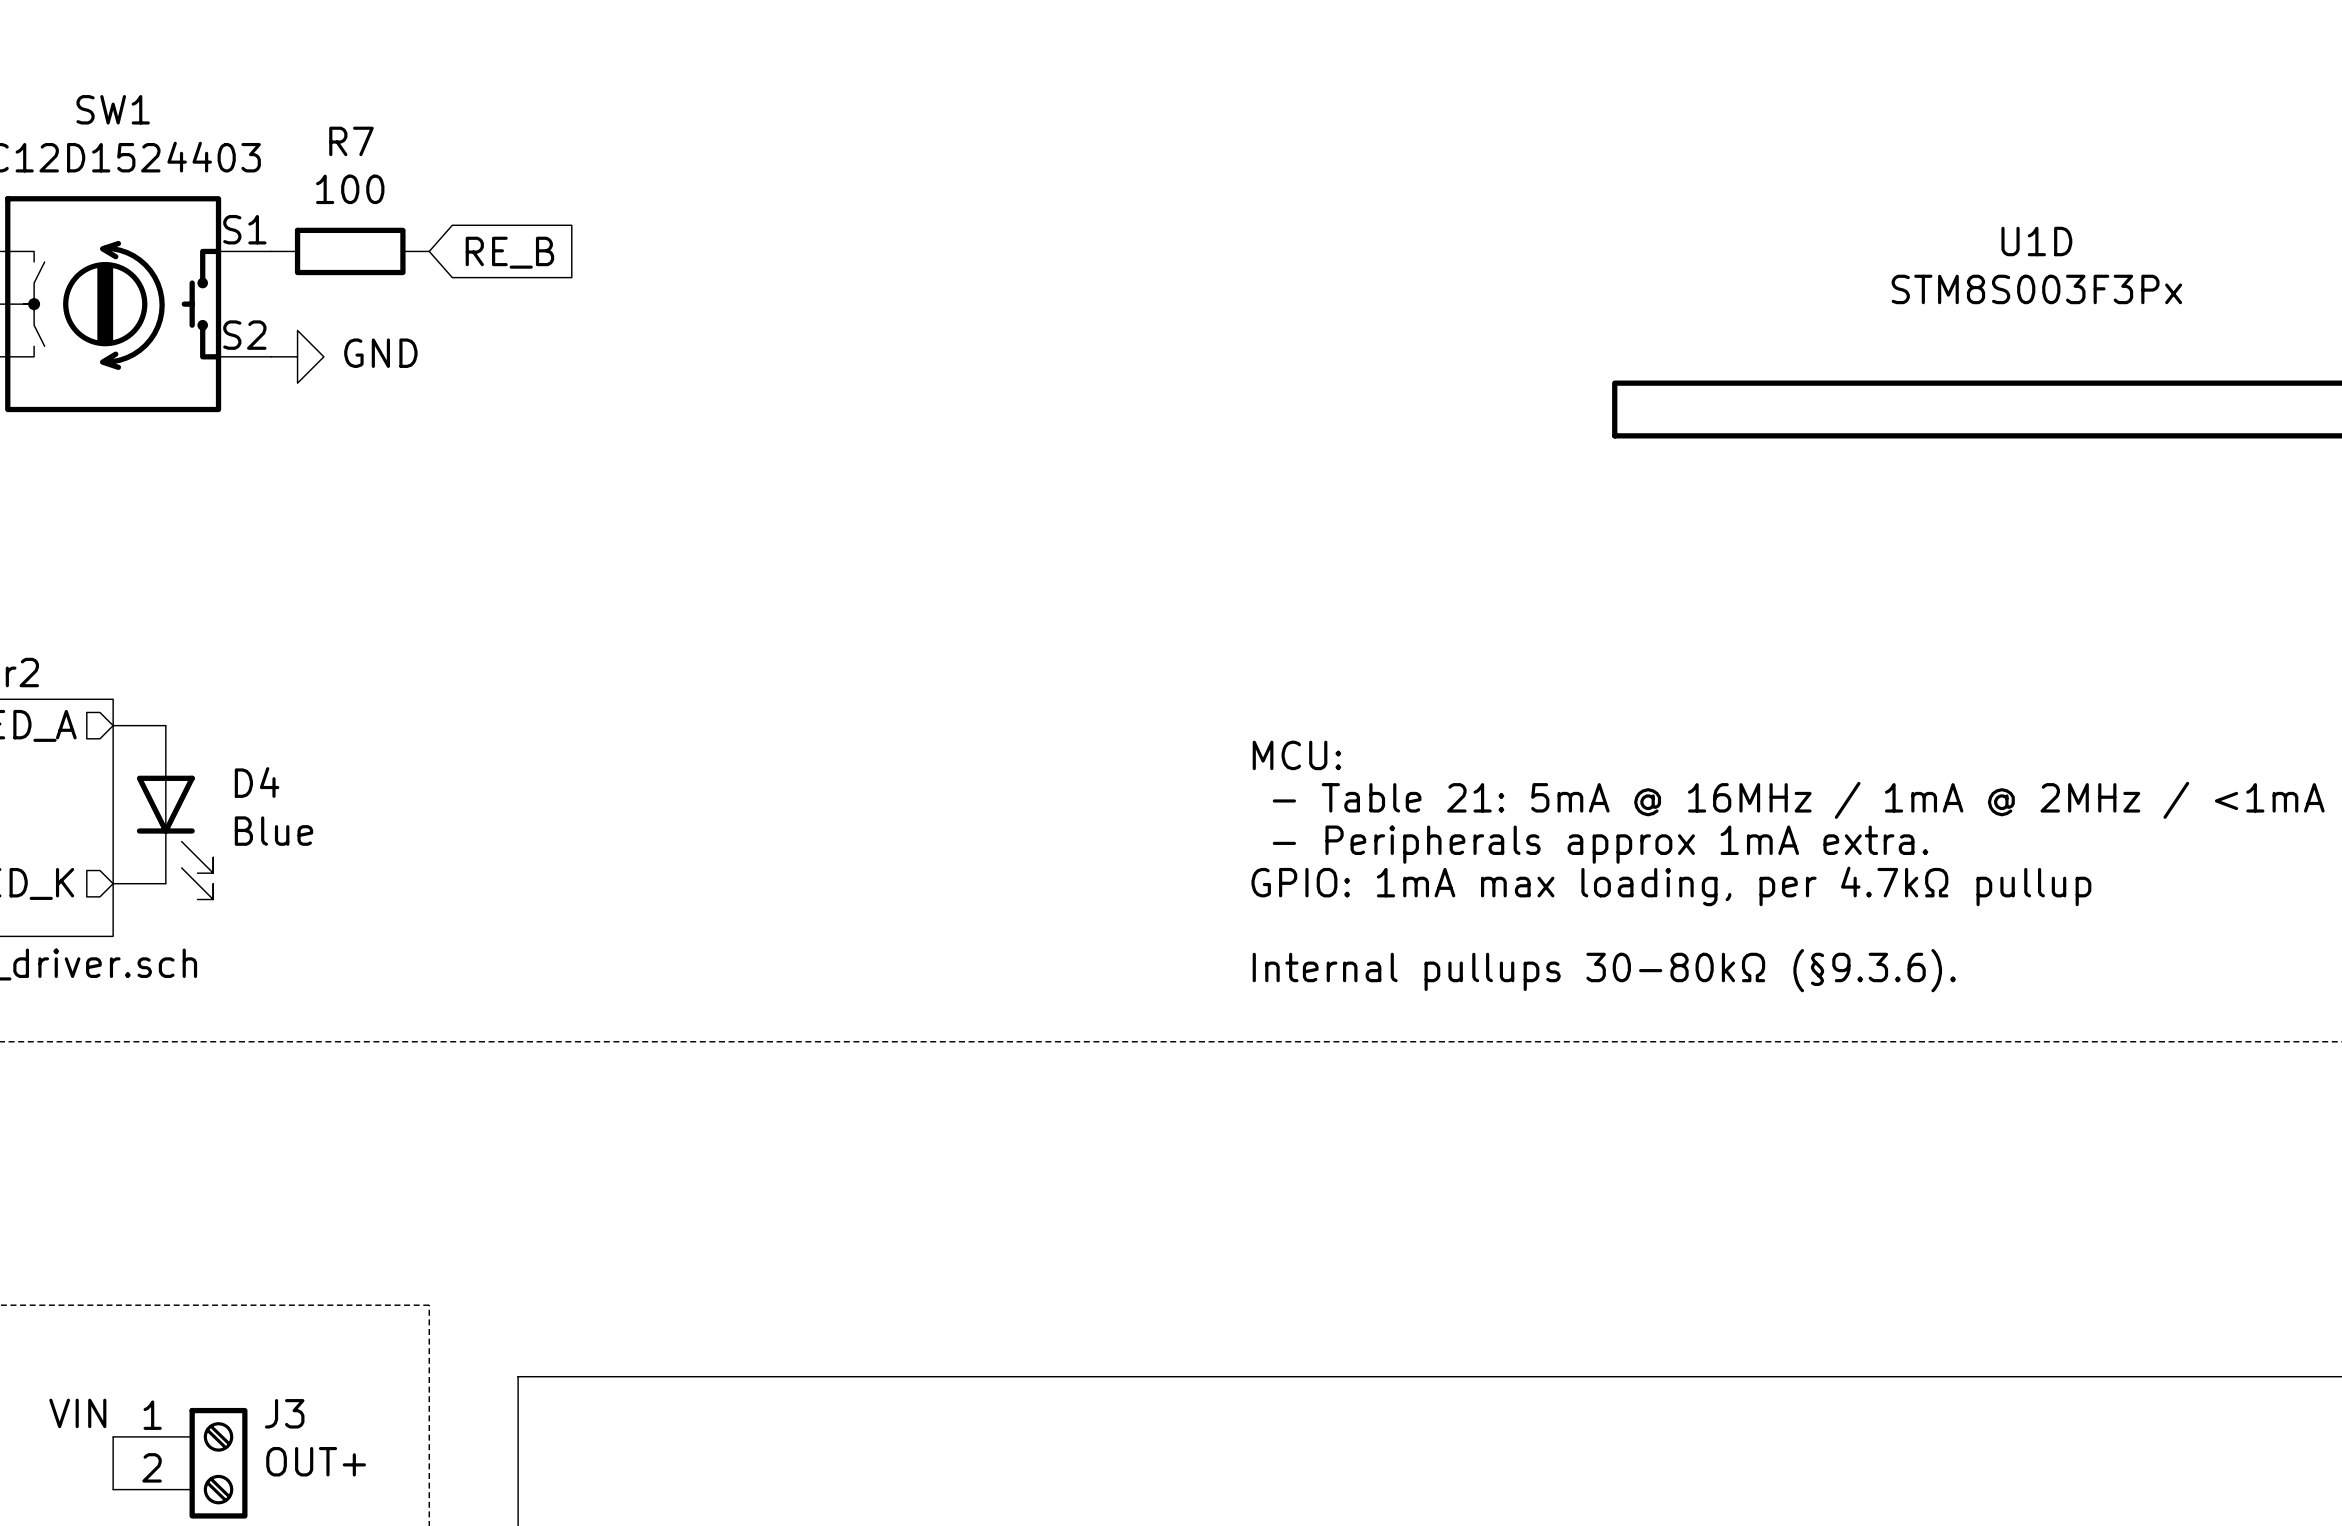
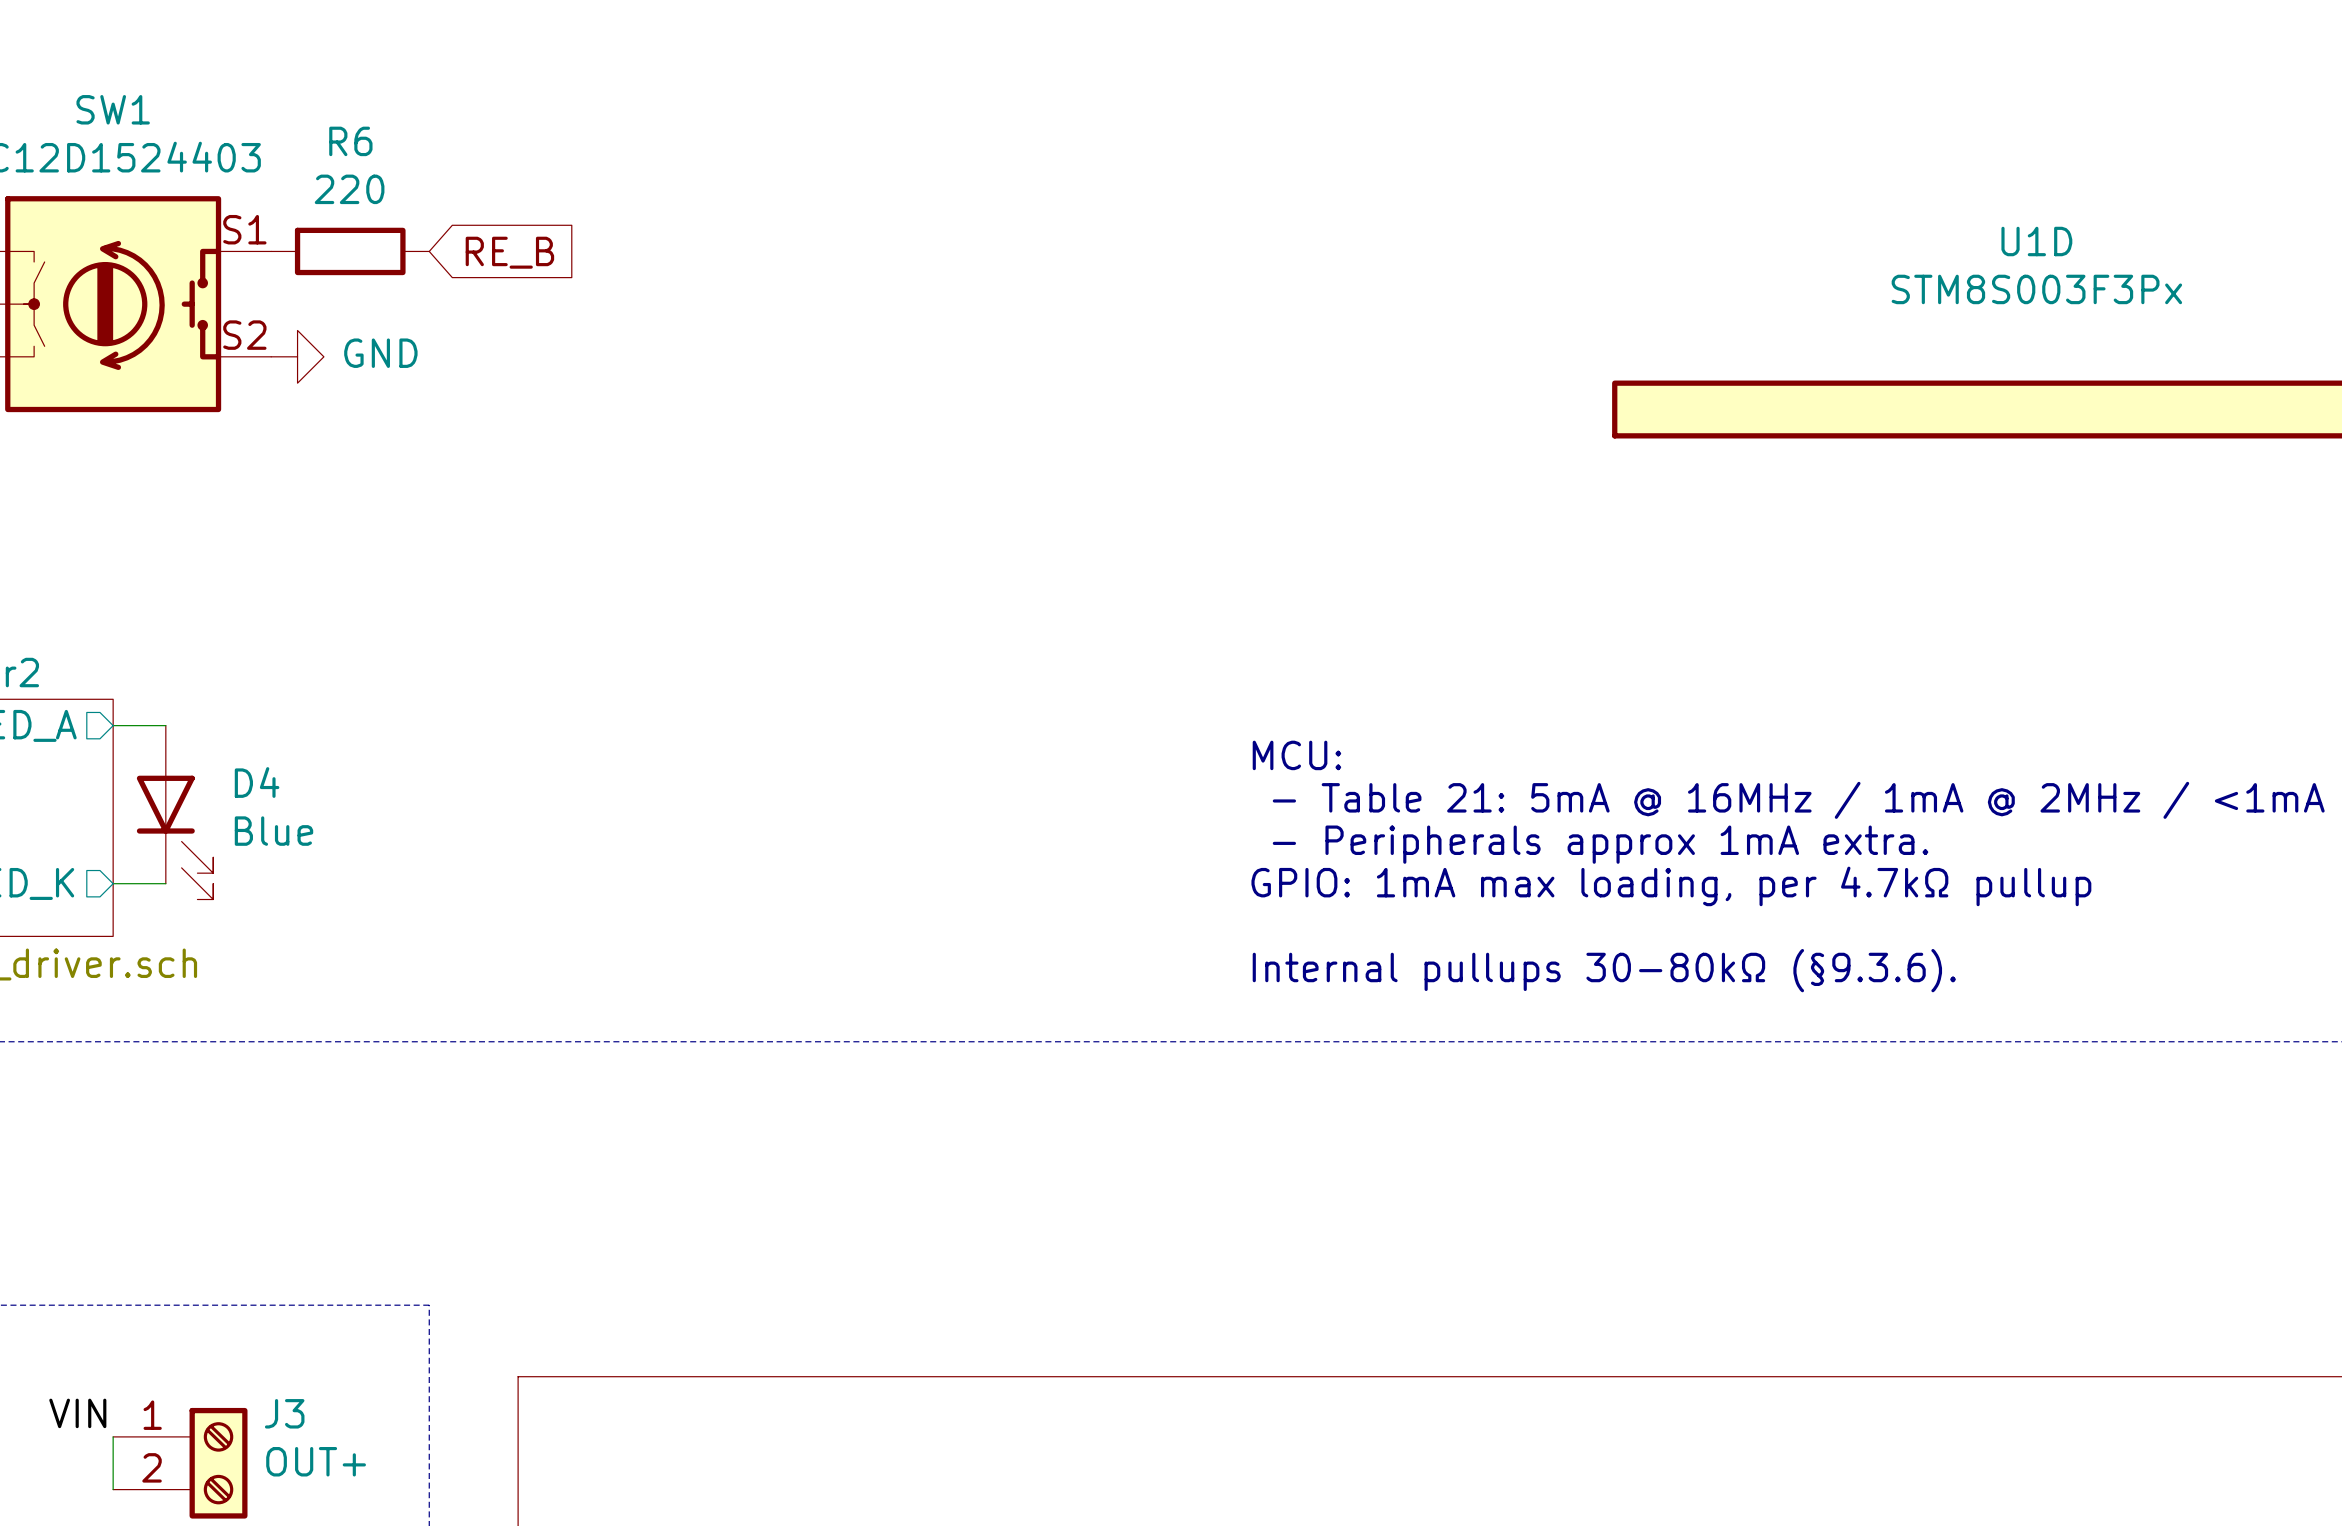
R7 name: R7 (351, 141) -> R6 (350, 141)
R7 value: 100 (350, 189) -> 220 (349, 189)

